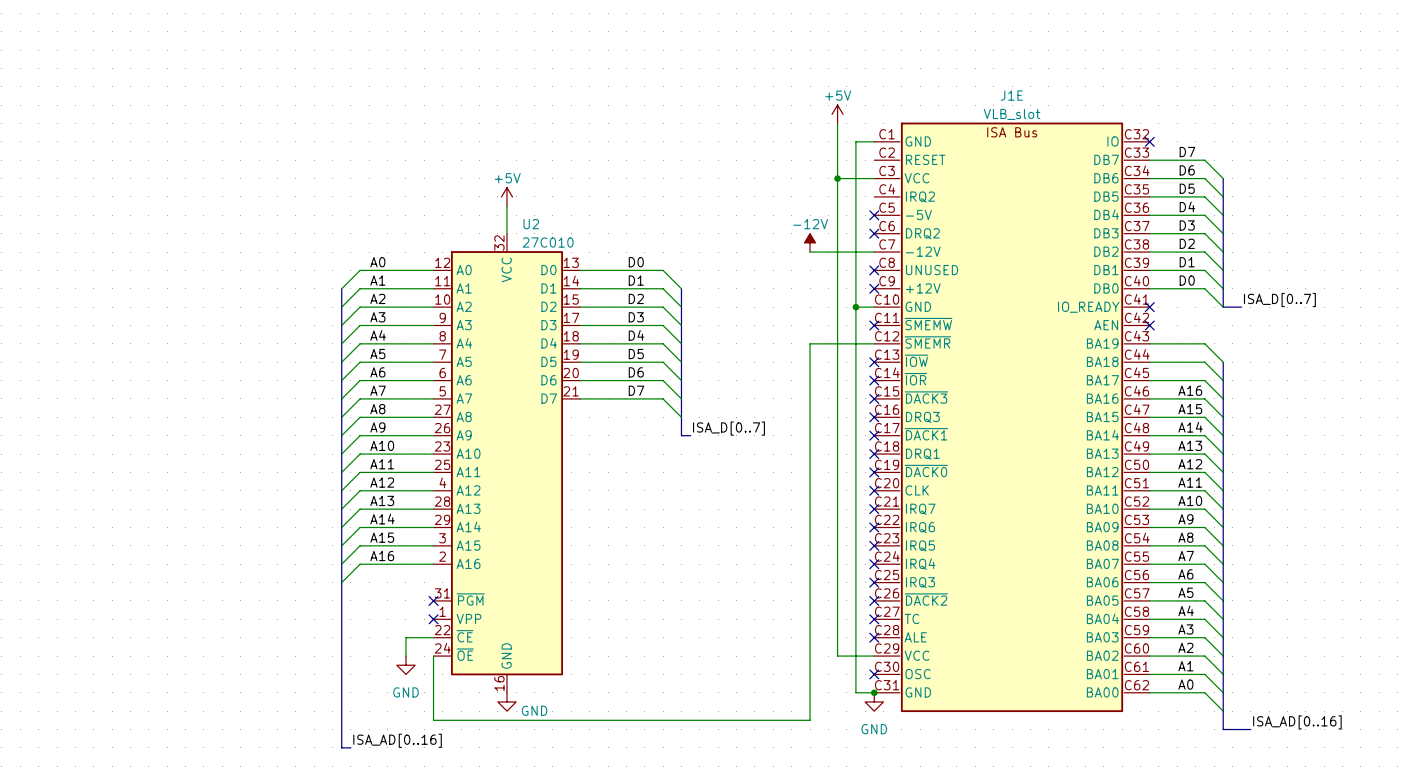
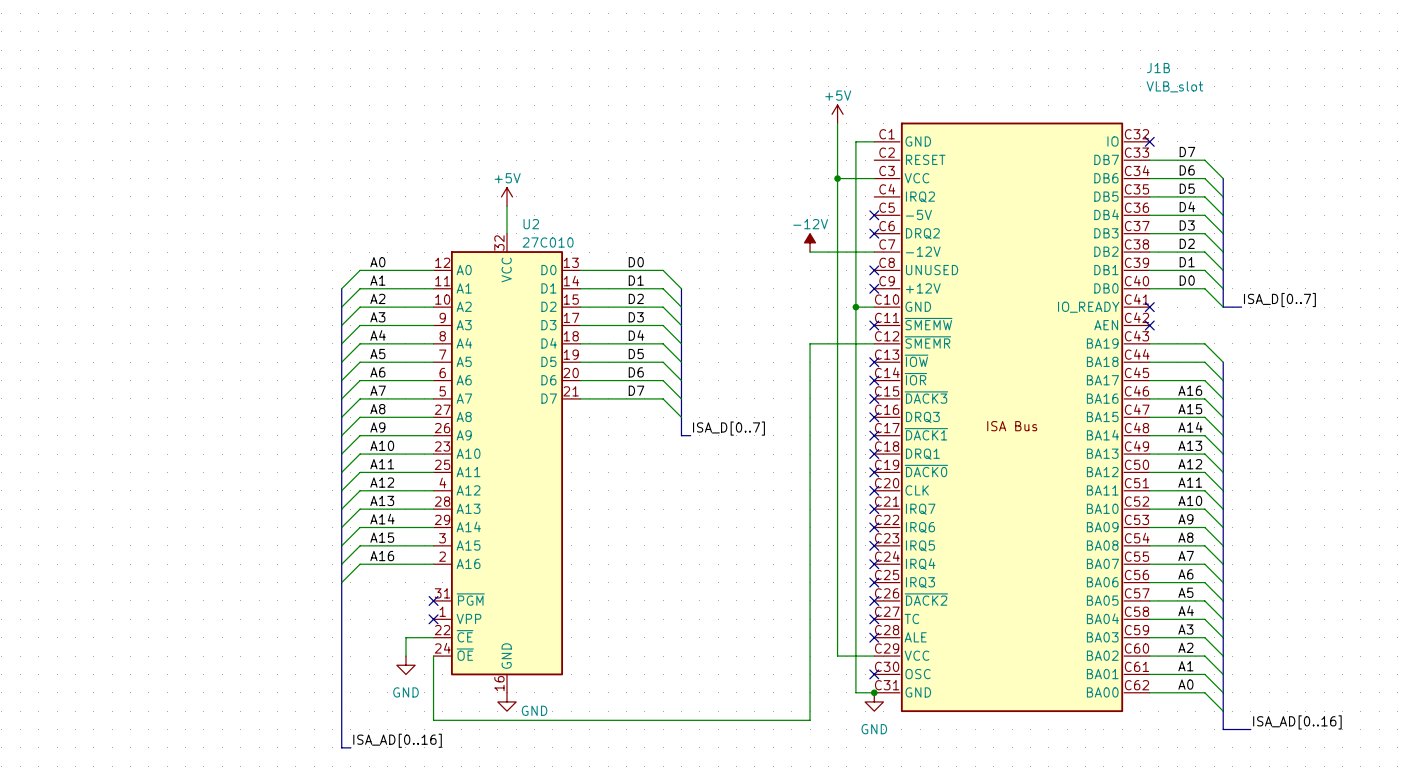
J1E name: J1E (1011, 95) -> J1B (1158, 68)
J1E value position: VLB_slot (1012, 114) -> VLB_slot (1174, 86)
J1E text position: ISA Bus (1012, 132) -> ISA Bus (1012, 426)

